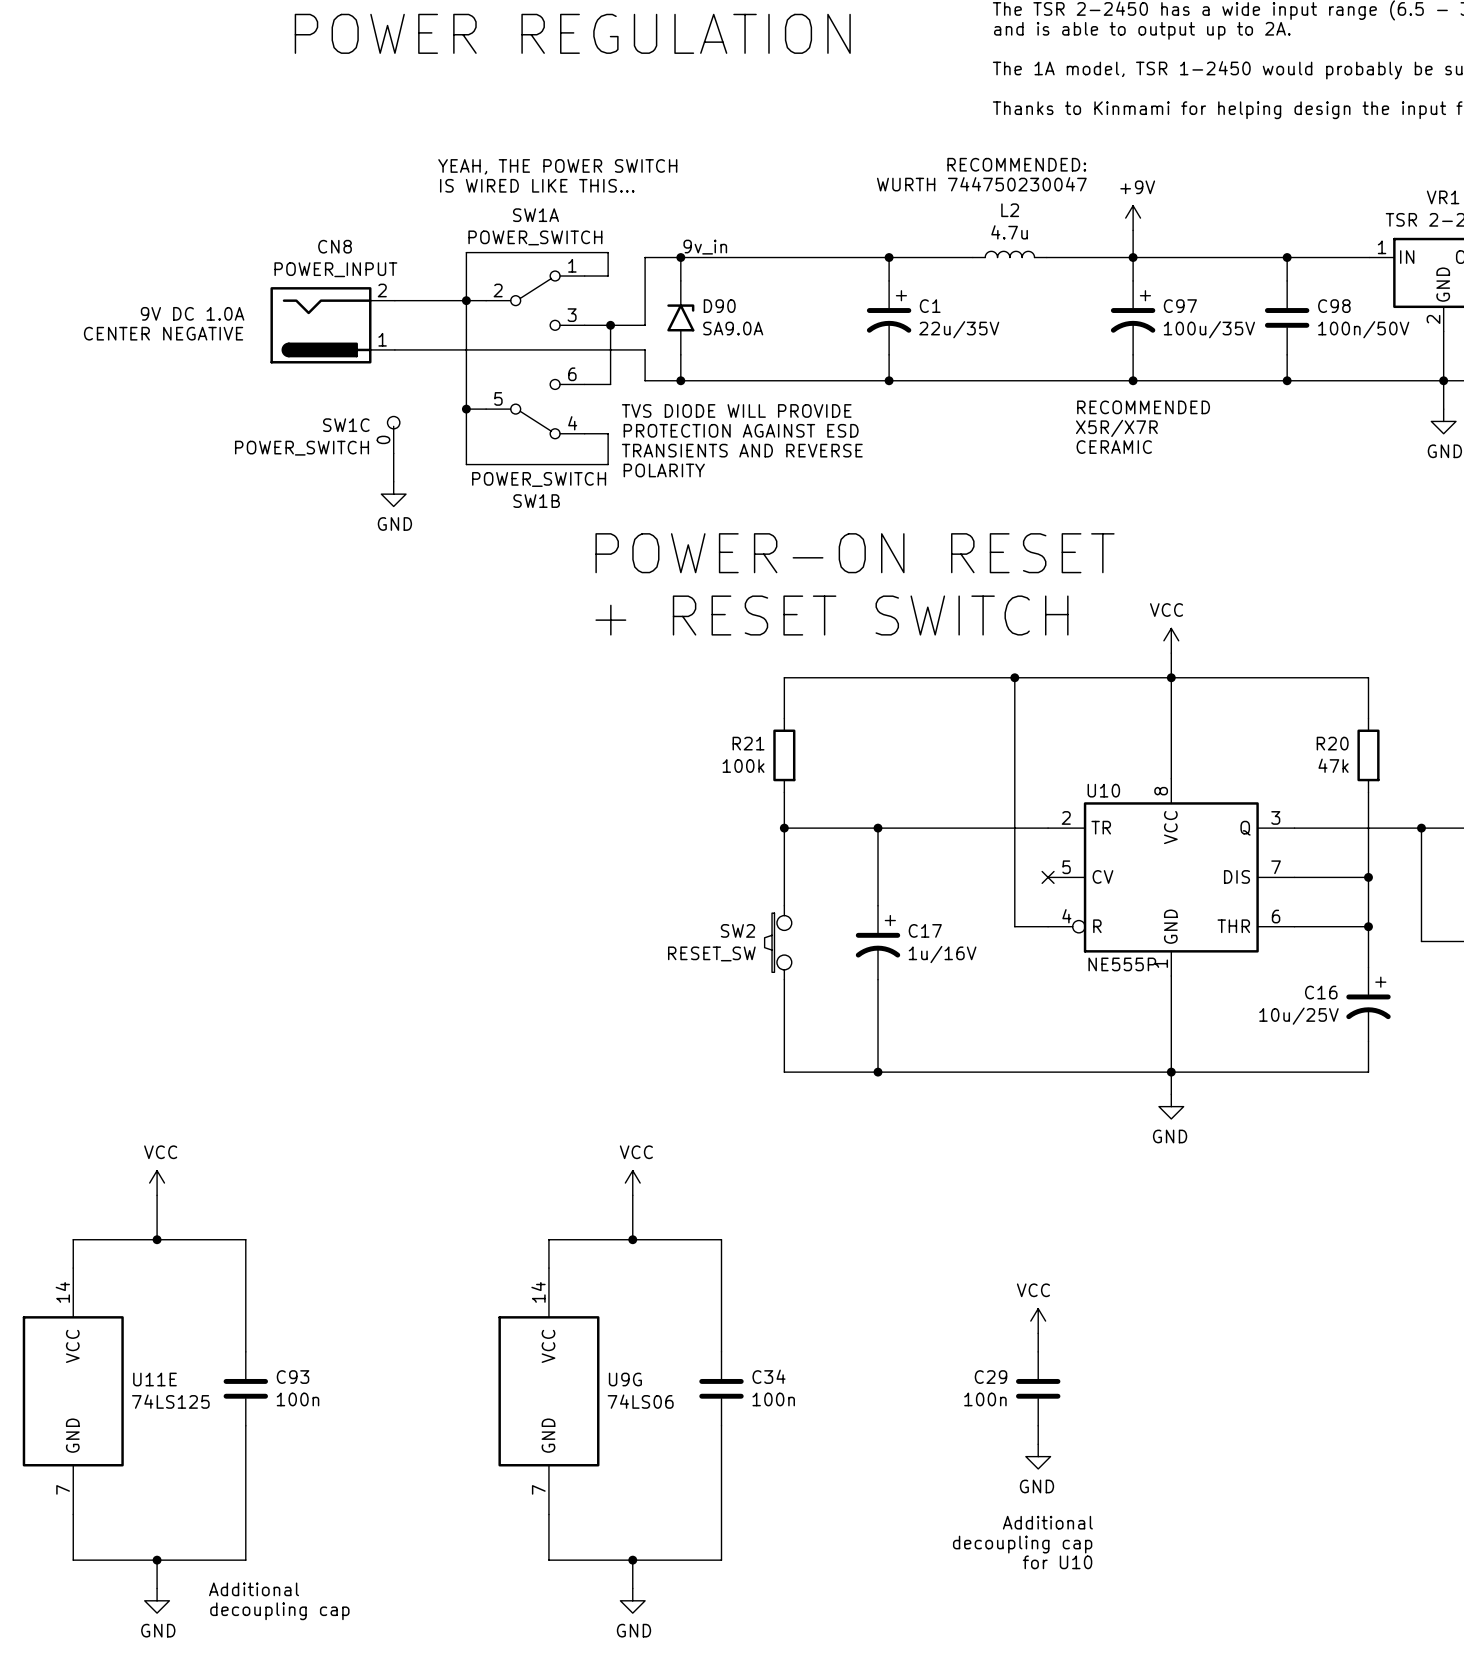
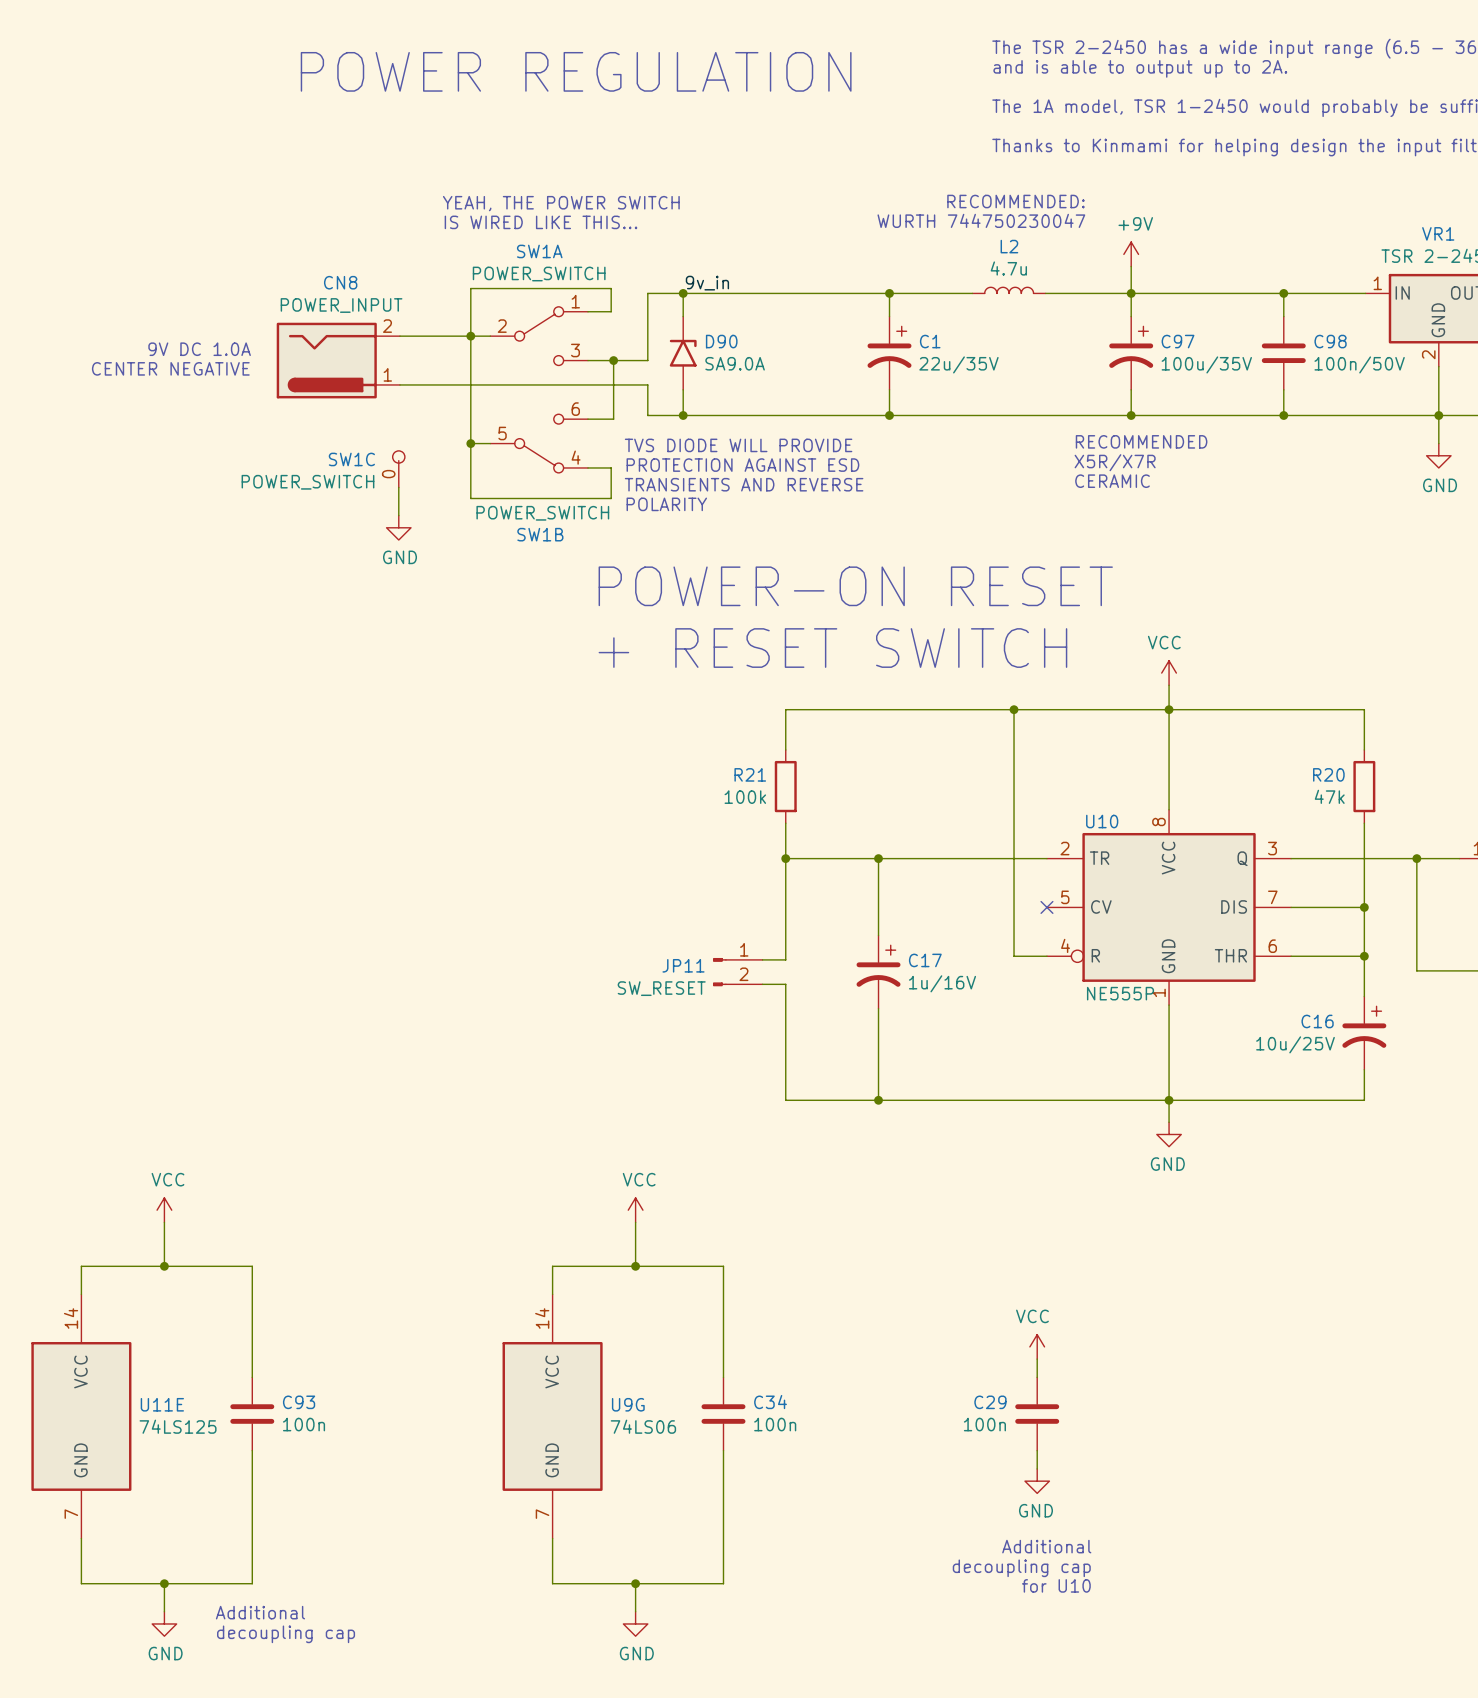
wire: none -> (785, 935) (785, 959) (762, 959)
JP11: none -> SW_RESET (737, 972)
SW2: RESET_SW (778, 942) -> none
wire: none -> (762, 984) (785, 984) (785, 1008)

